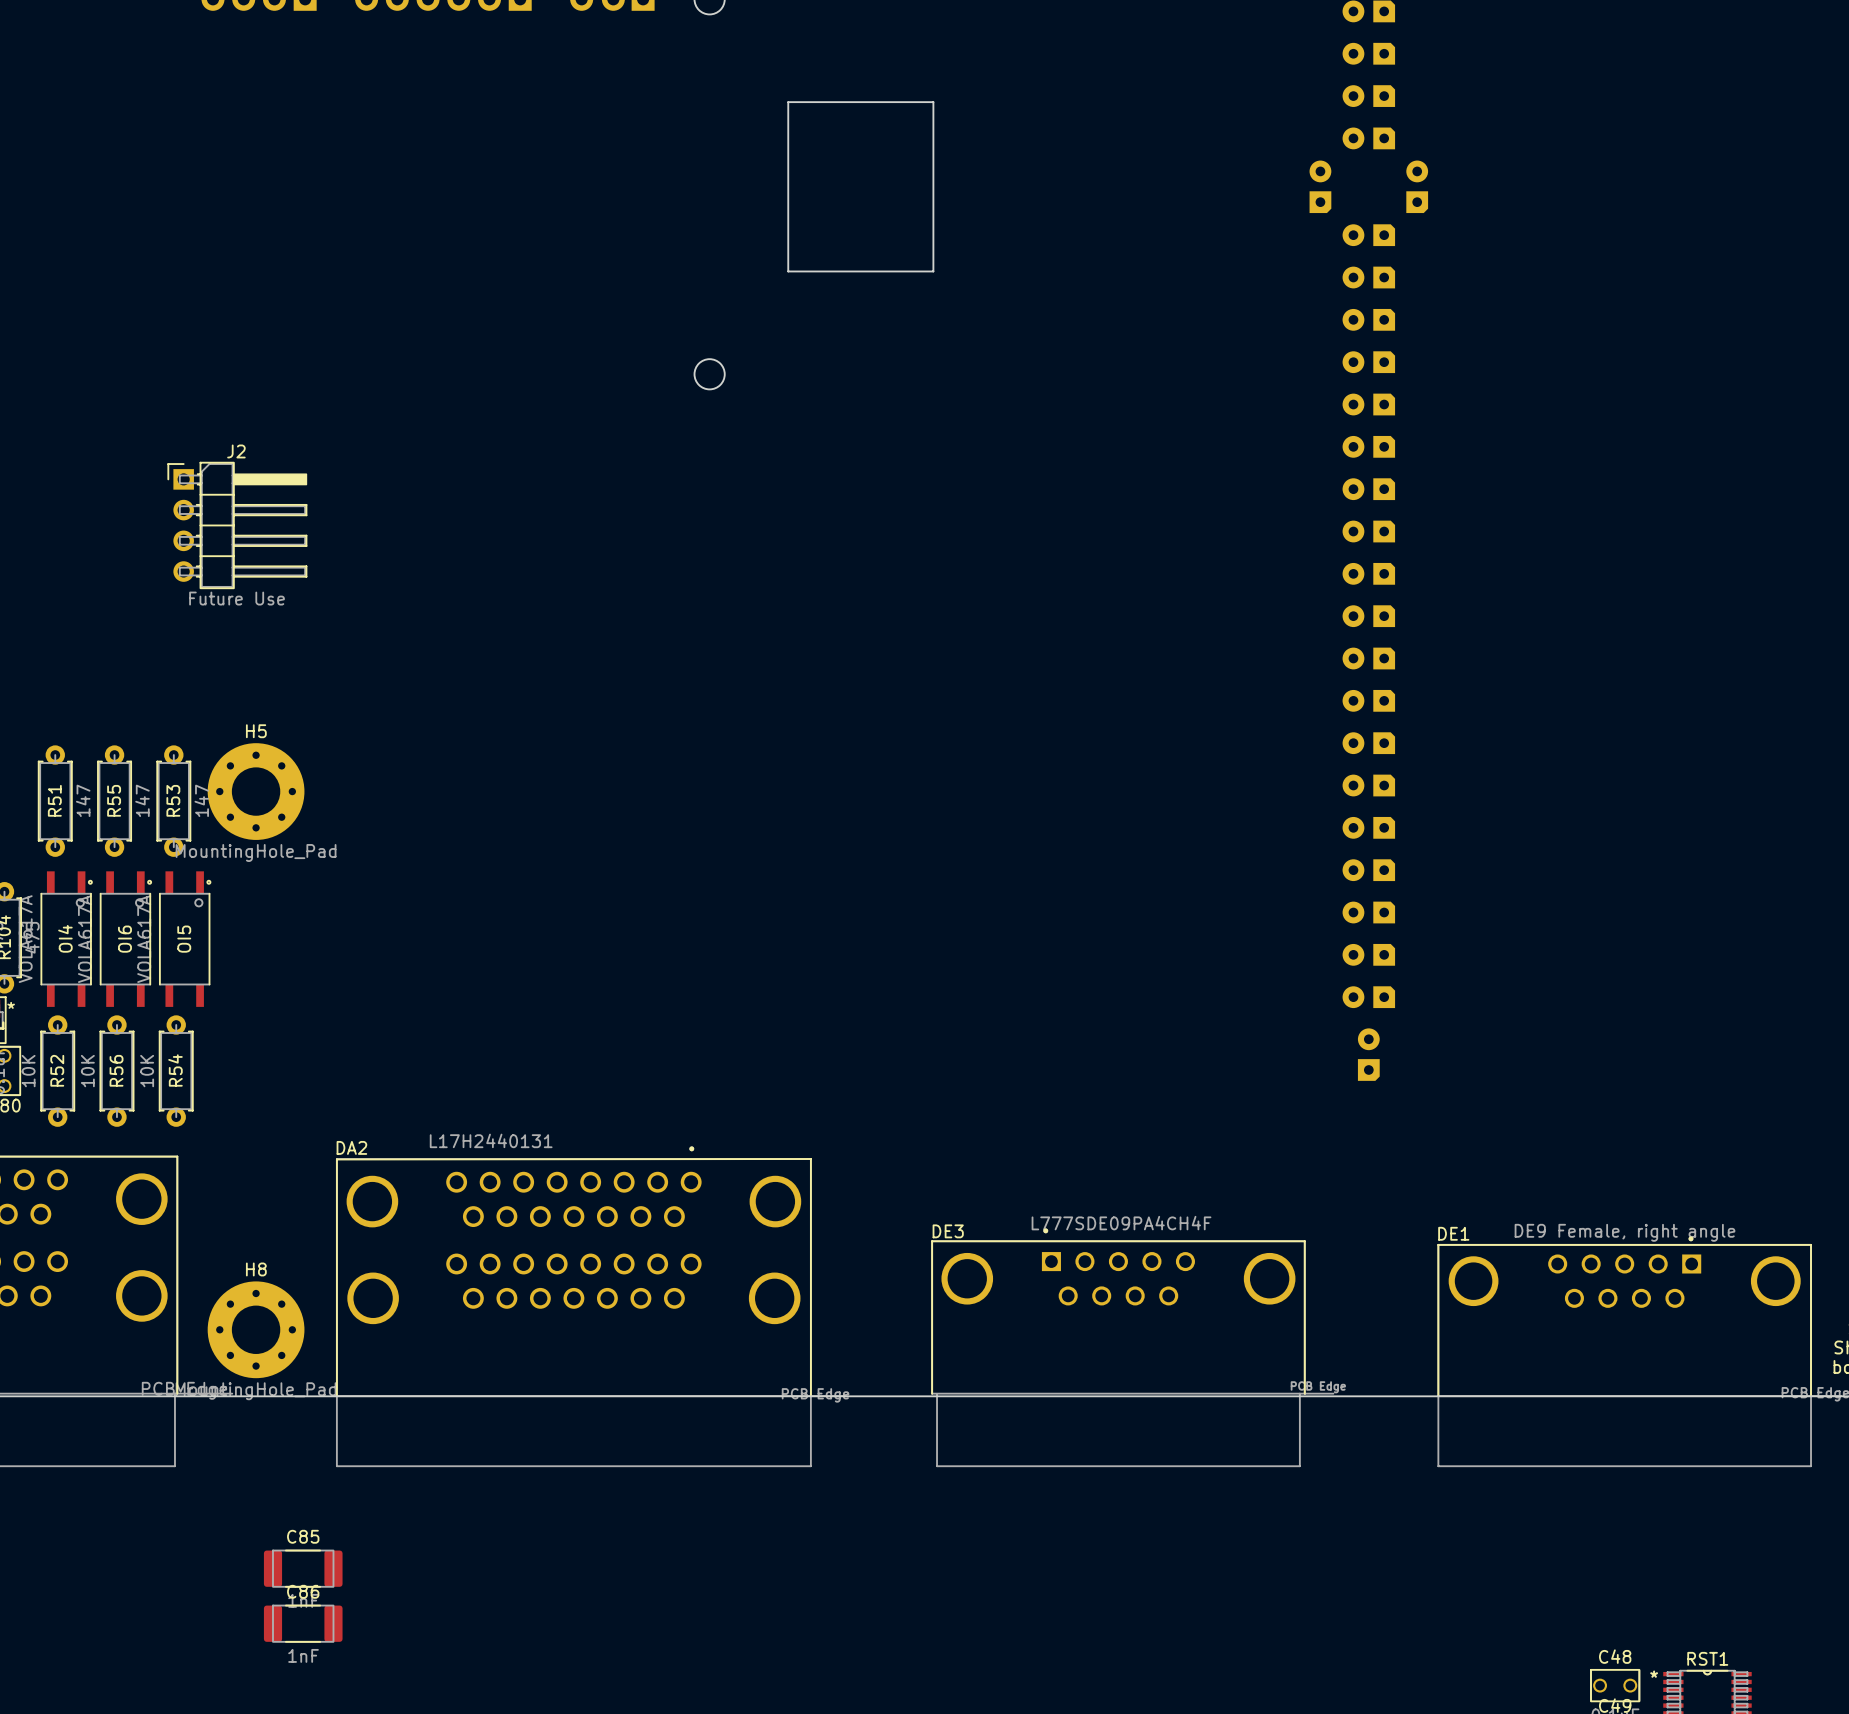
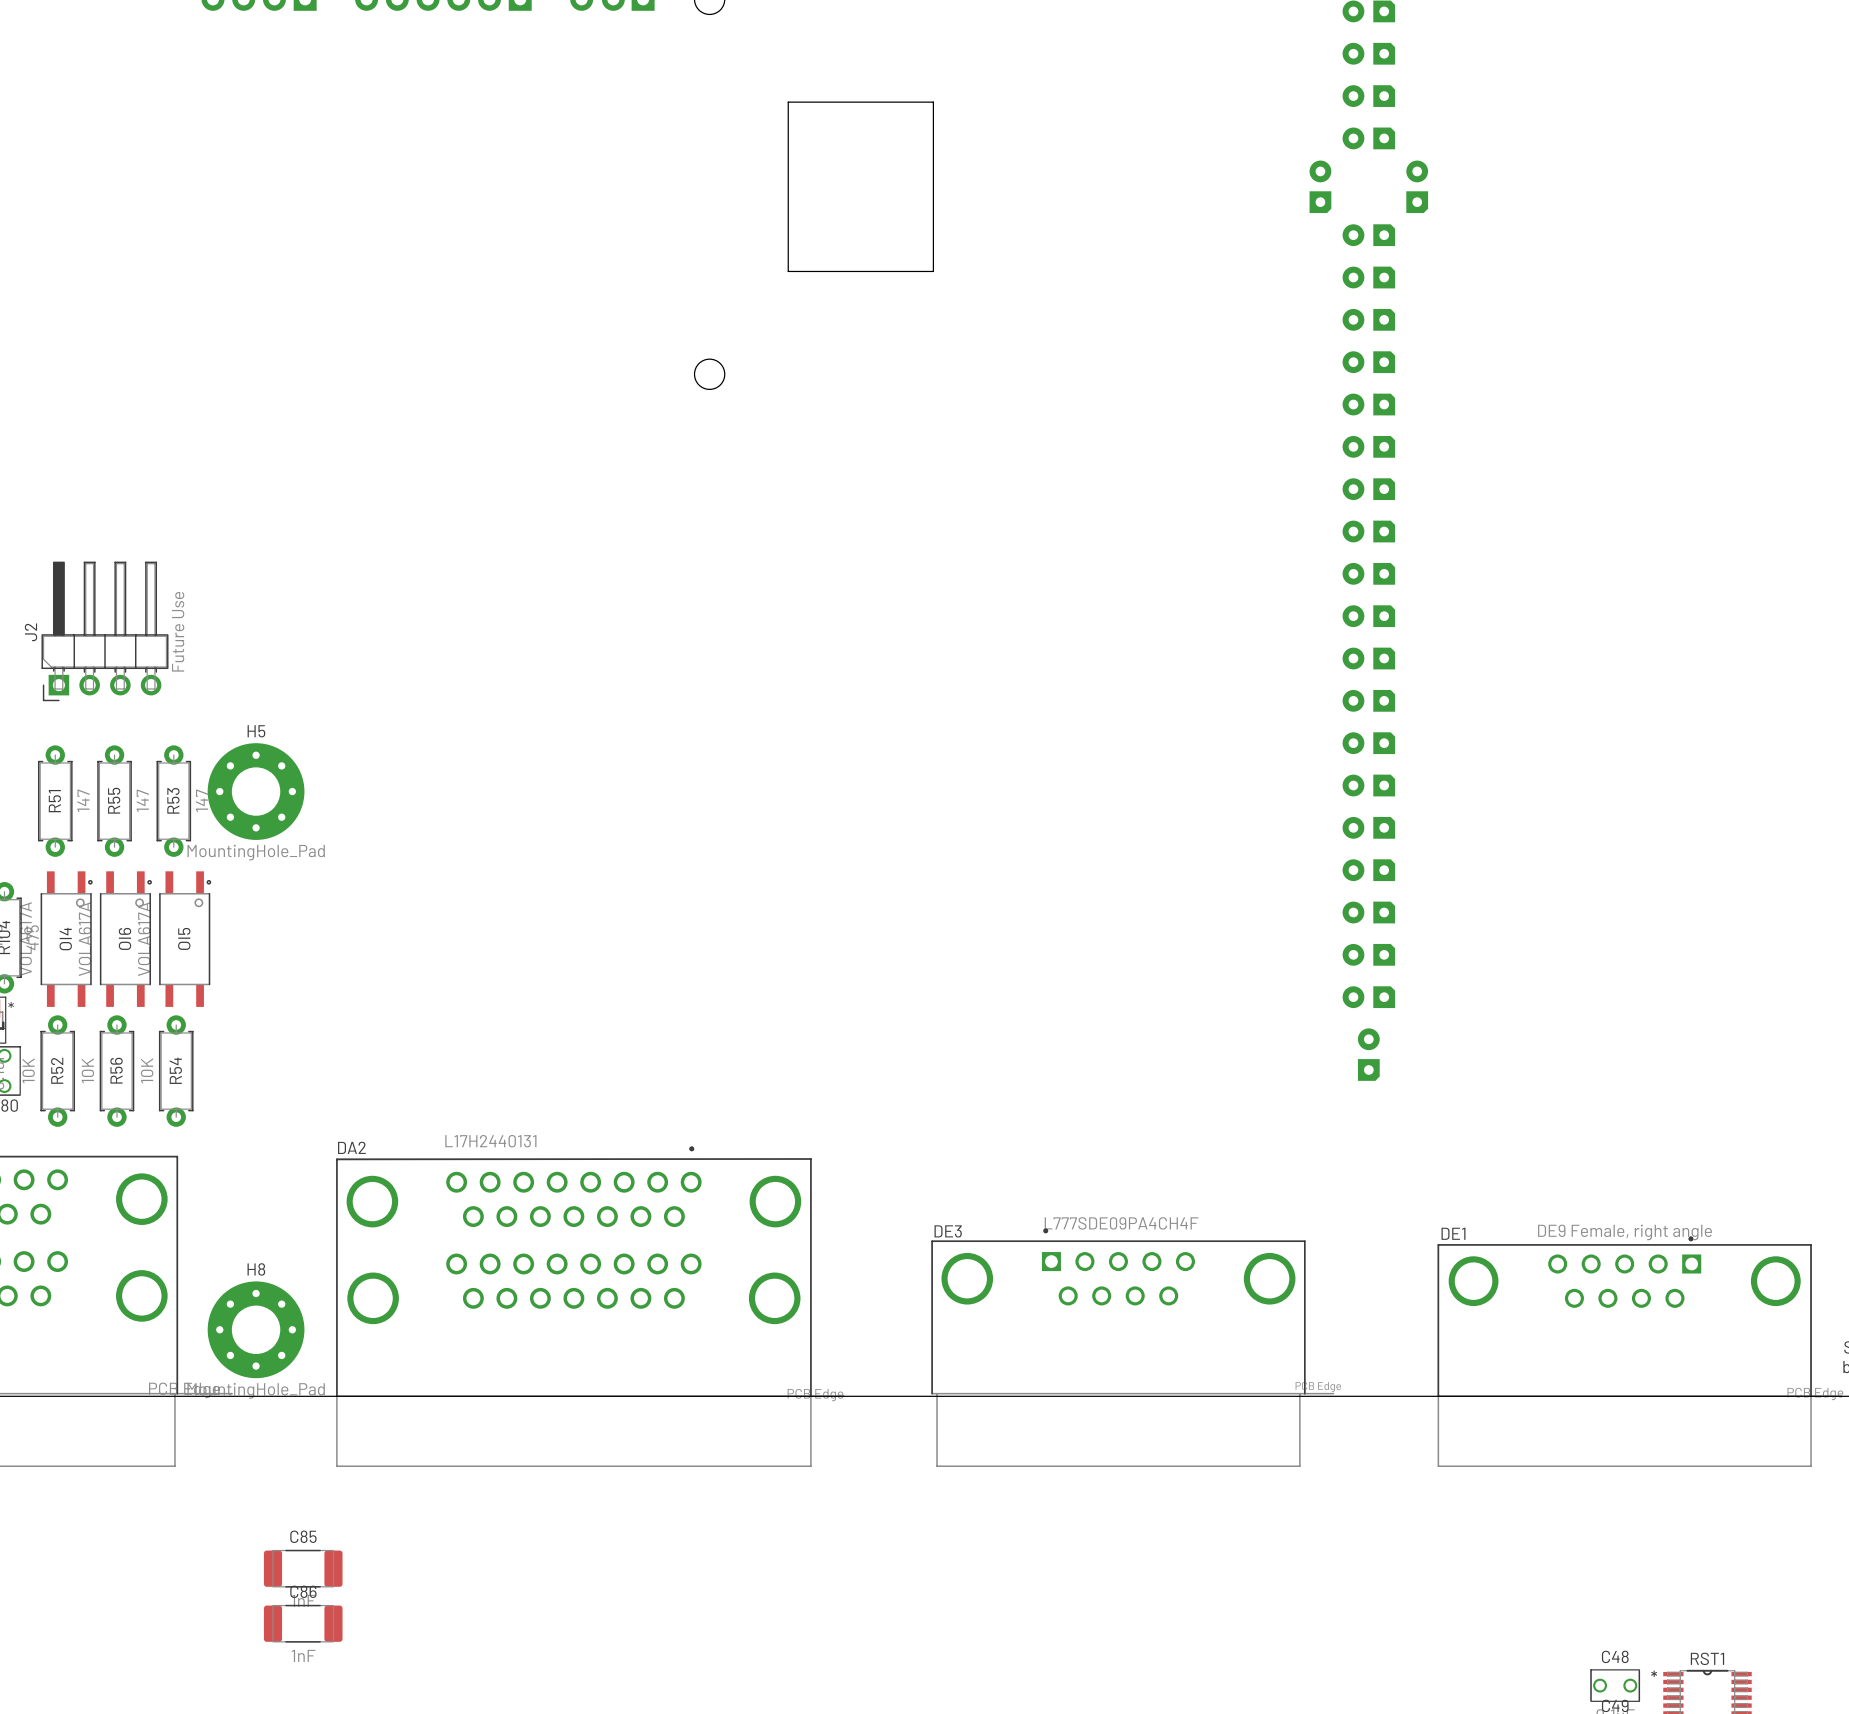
J2 rotation: 0° (237, 525) -> 90° counterclockwise (104, 631)
J2 position: (237, 525) -> (104, 631)

